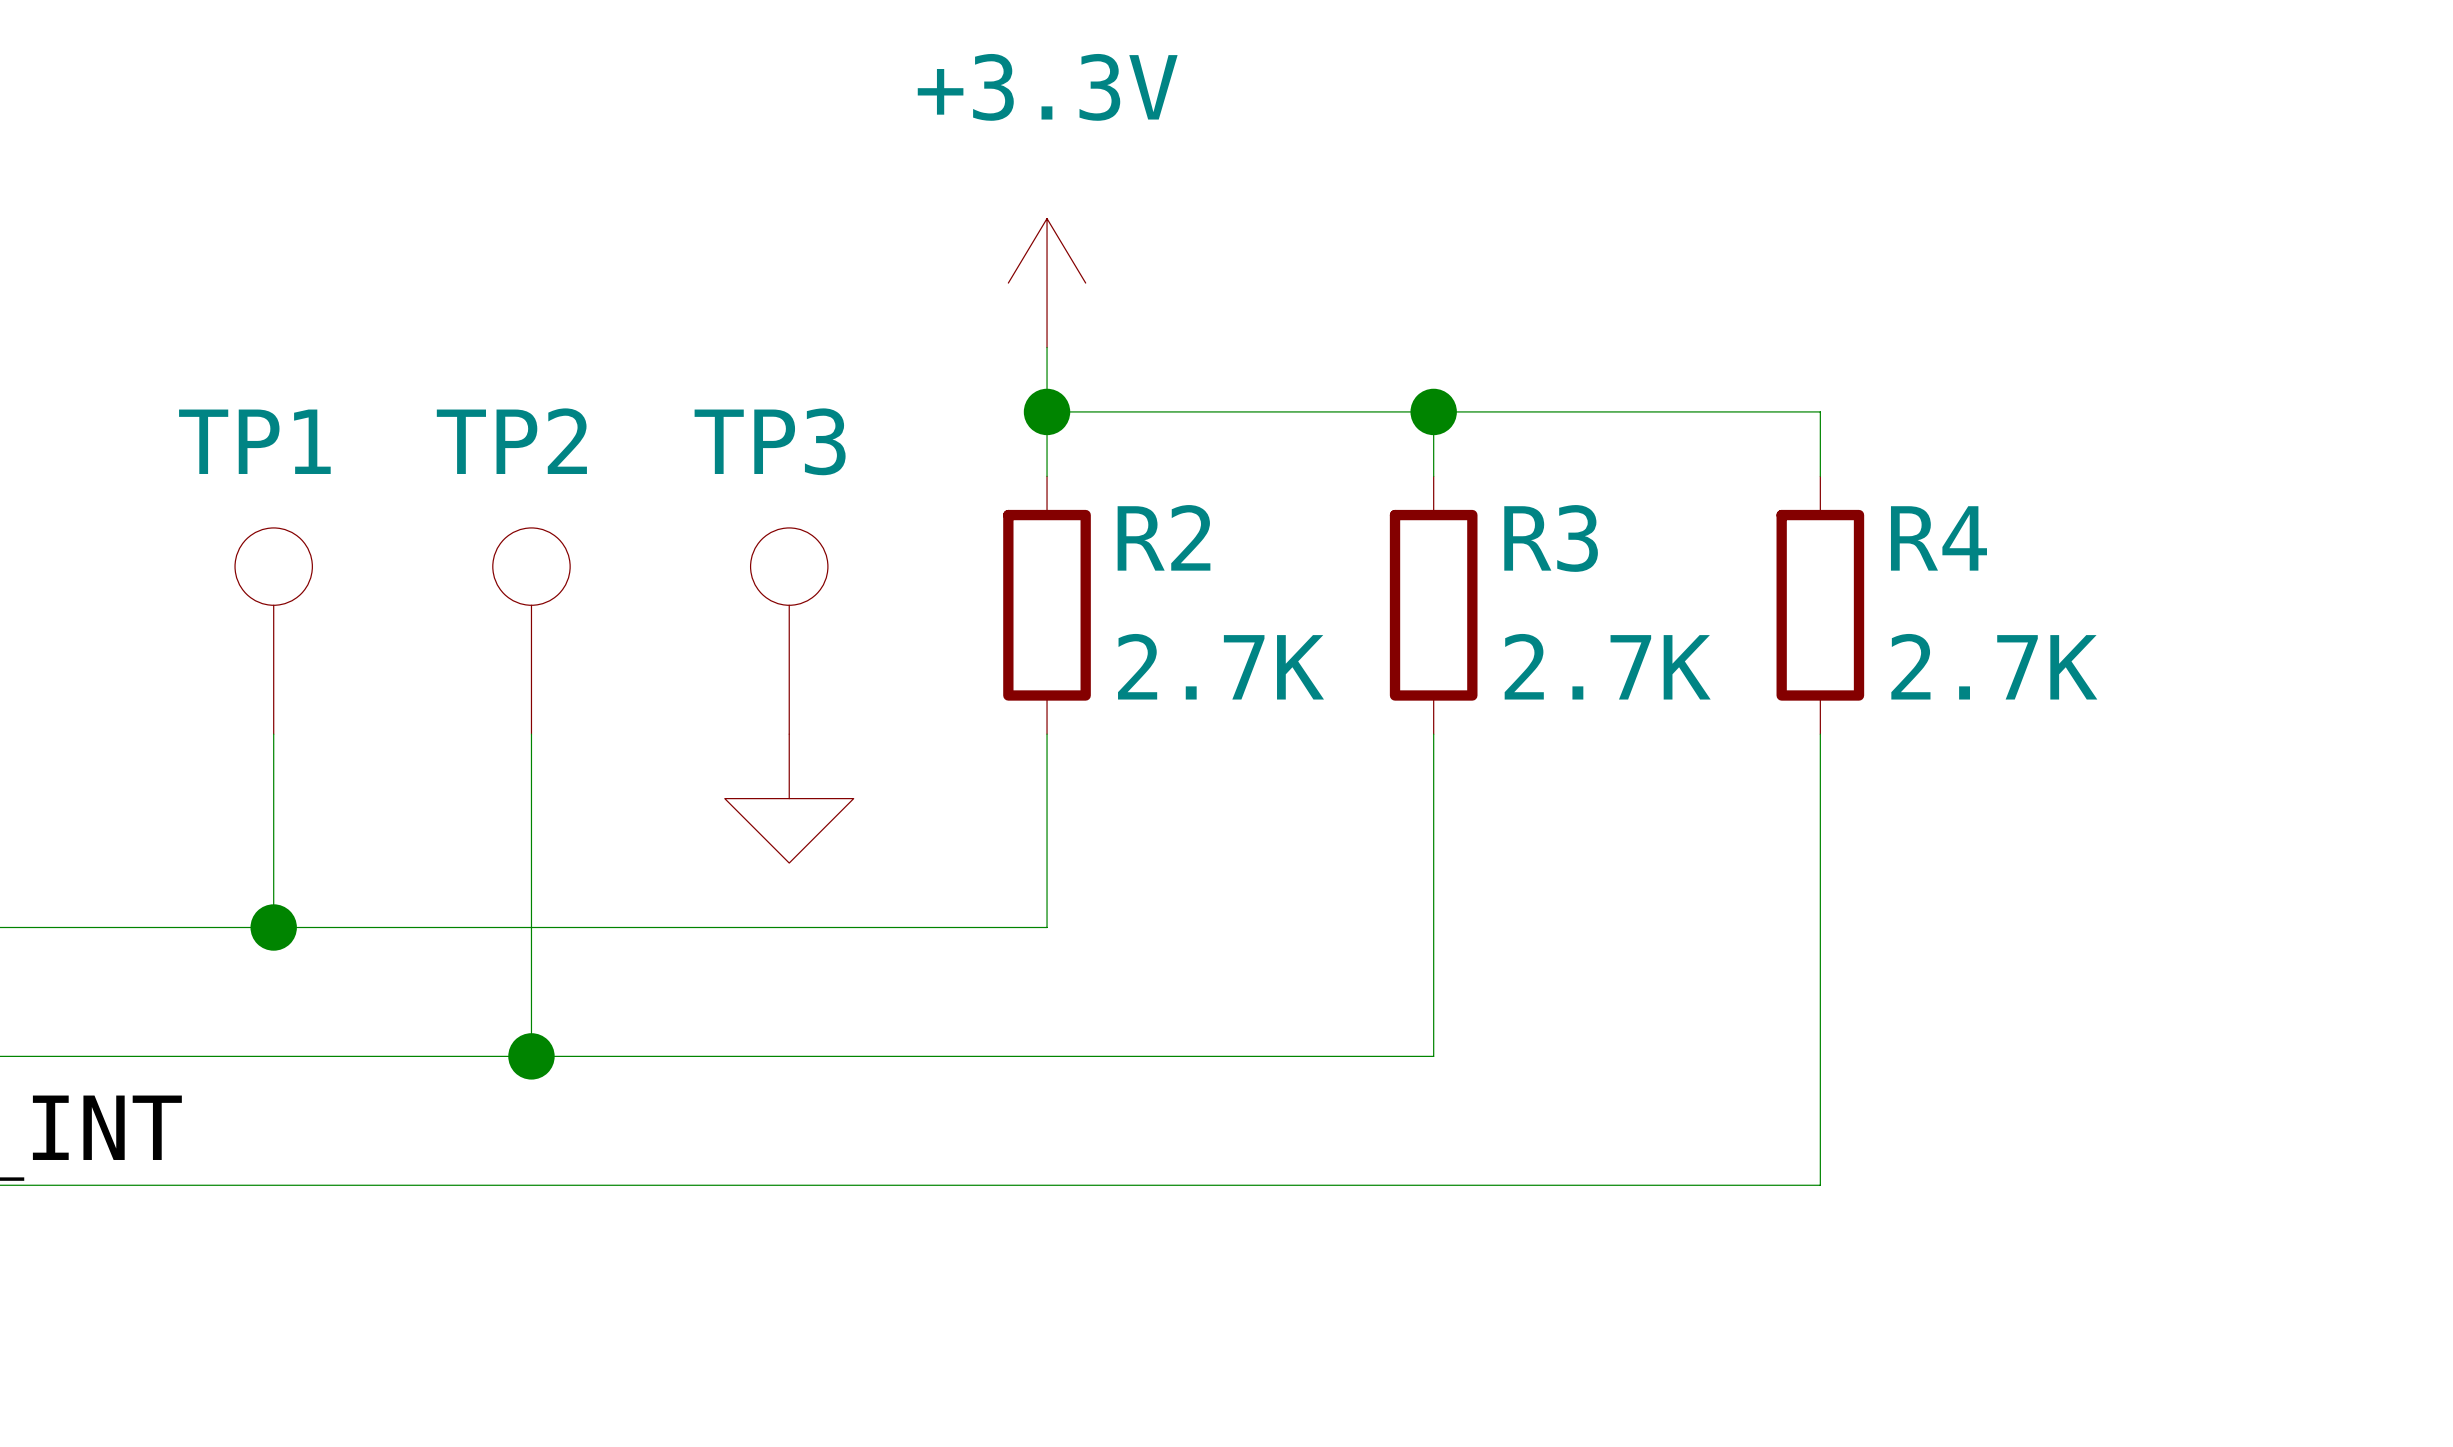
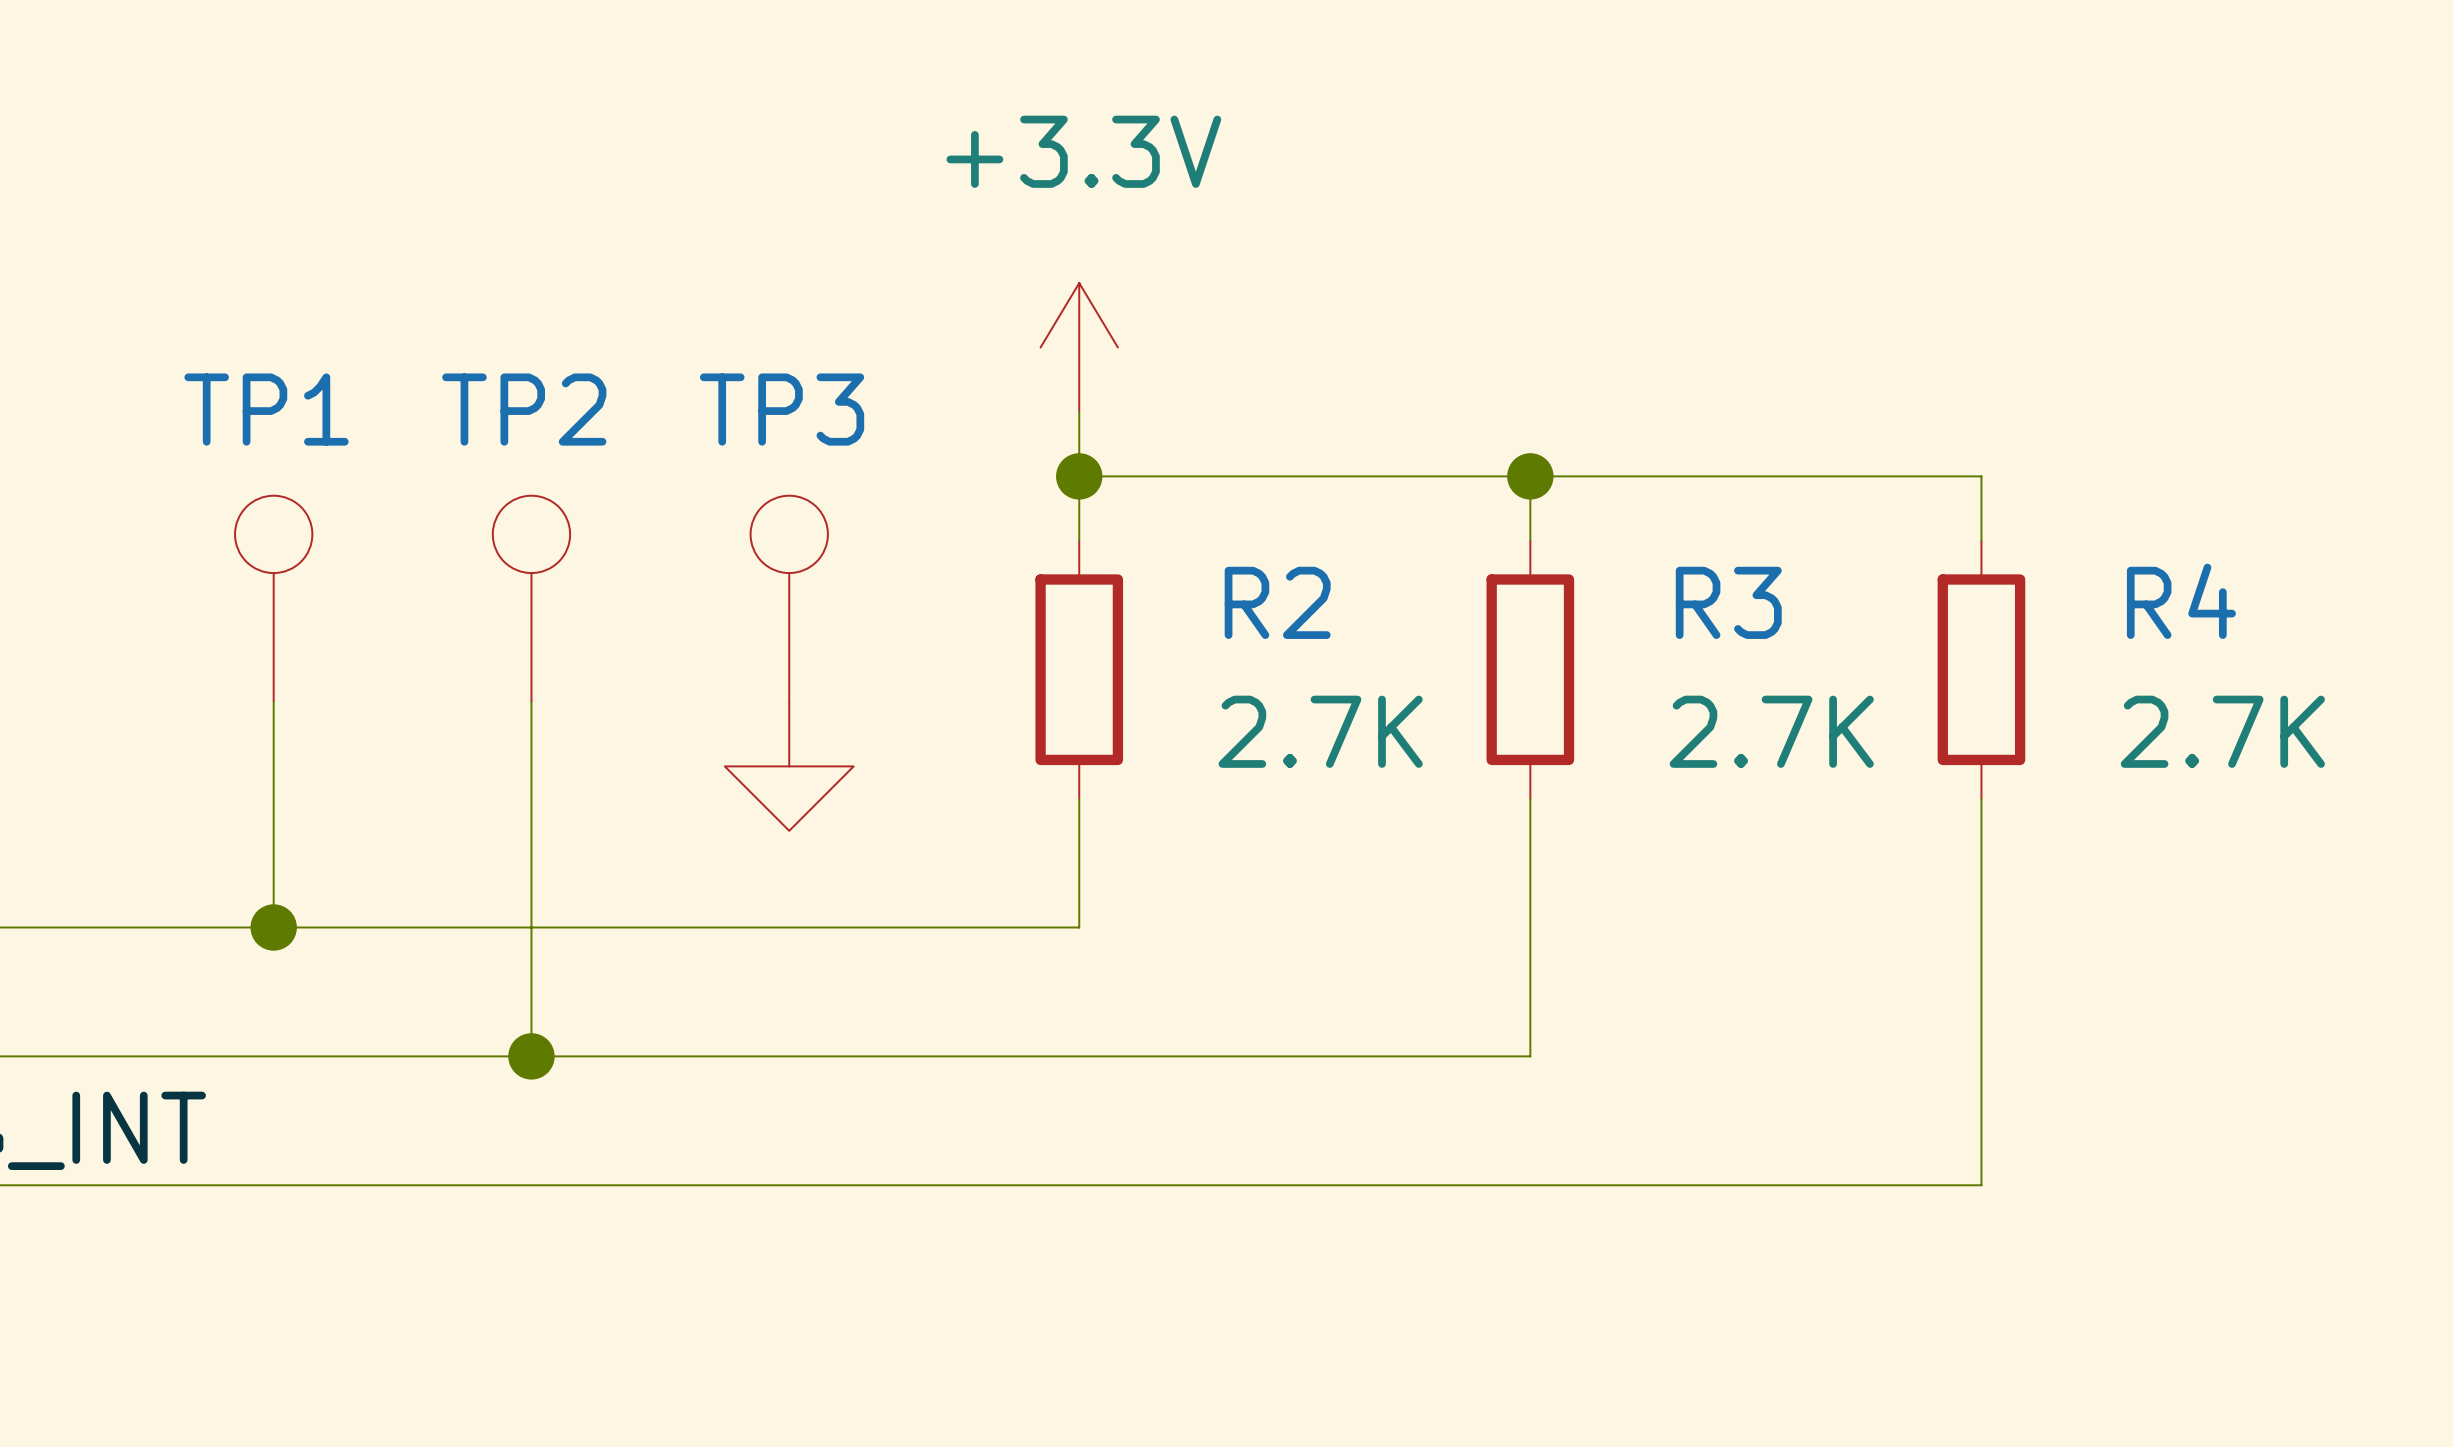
power symbol position: +3.3V (1047, 283) -> +3.3V (1079, 347)
wire: (1047, 347) (1047, 476) -> (1079, 411) (1079, 540)
wire: (1047, 411) (1820, 411) (1820, 476) -> none
junction position: (1047, 411) -> (1079, 476)
wire: (1433, 411) (1433, 476) -> (1530, 476) (1530, 540)
junction position: (1433, 411) -> (1530, 476)
wire: none -> (1079, 476) (1981, 476) (1981, 540)
R2 name position: R2 (1164, 537) -> R2 (1277, 602)
R3 name position: R3 (1551, 538) -> R3 (1728, 602)
R4 name position: R4 (1938, 538) -> R4 (2181, 601)
R2 position: (1047, 605) -> (1079, 669)
R3 position: (1433, 605) -> (1530, 669)
R4 position: (1820, 605) -> (1981, 669)
TP1 position: (273, 631) -> (273, 598)
TP2 position: (531, 631) -> (531, 598)
TP3 position: (789, 631) -> (789, 598)
R2 value position: 2.7K (1221, 666) -> 2.7K (1320, 731)
R3 value position: 2.7K (1607, 666) -> 2.7K (1771, 731)
R4 value position: 2.7K (1994, 666) -> 2.7K (2222, 731)
wire: (1047, 734) (1047, 927) -> (1079, 798) (1079, 927) (1047, 927)
wire: (1433, 734) (1433, 1056) -> (1530, 798) (1530, 1056) (1433, 1056)
wire: (1820, 734) (1820, 1185) -> (1981, 798) (1981, 1185) (1820, 1185)
power symbol position: (789, 798) -> (789, 766)

